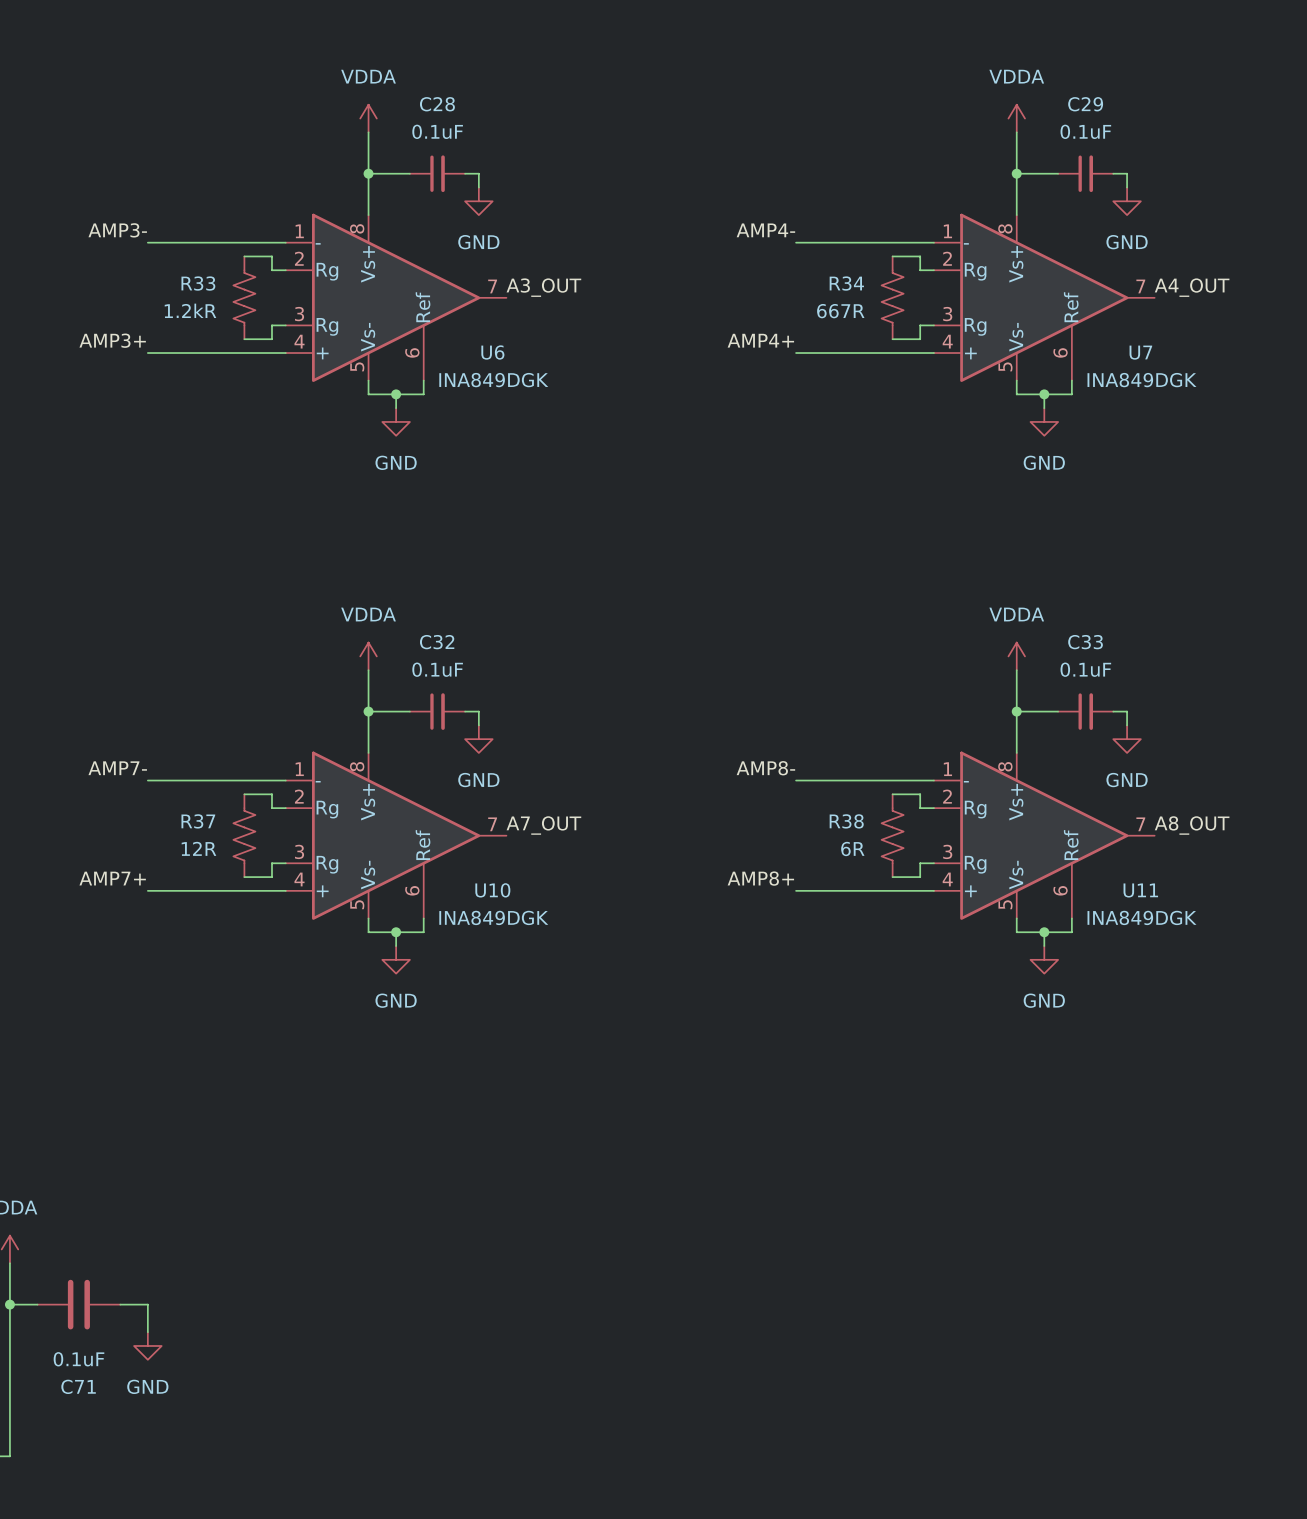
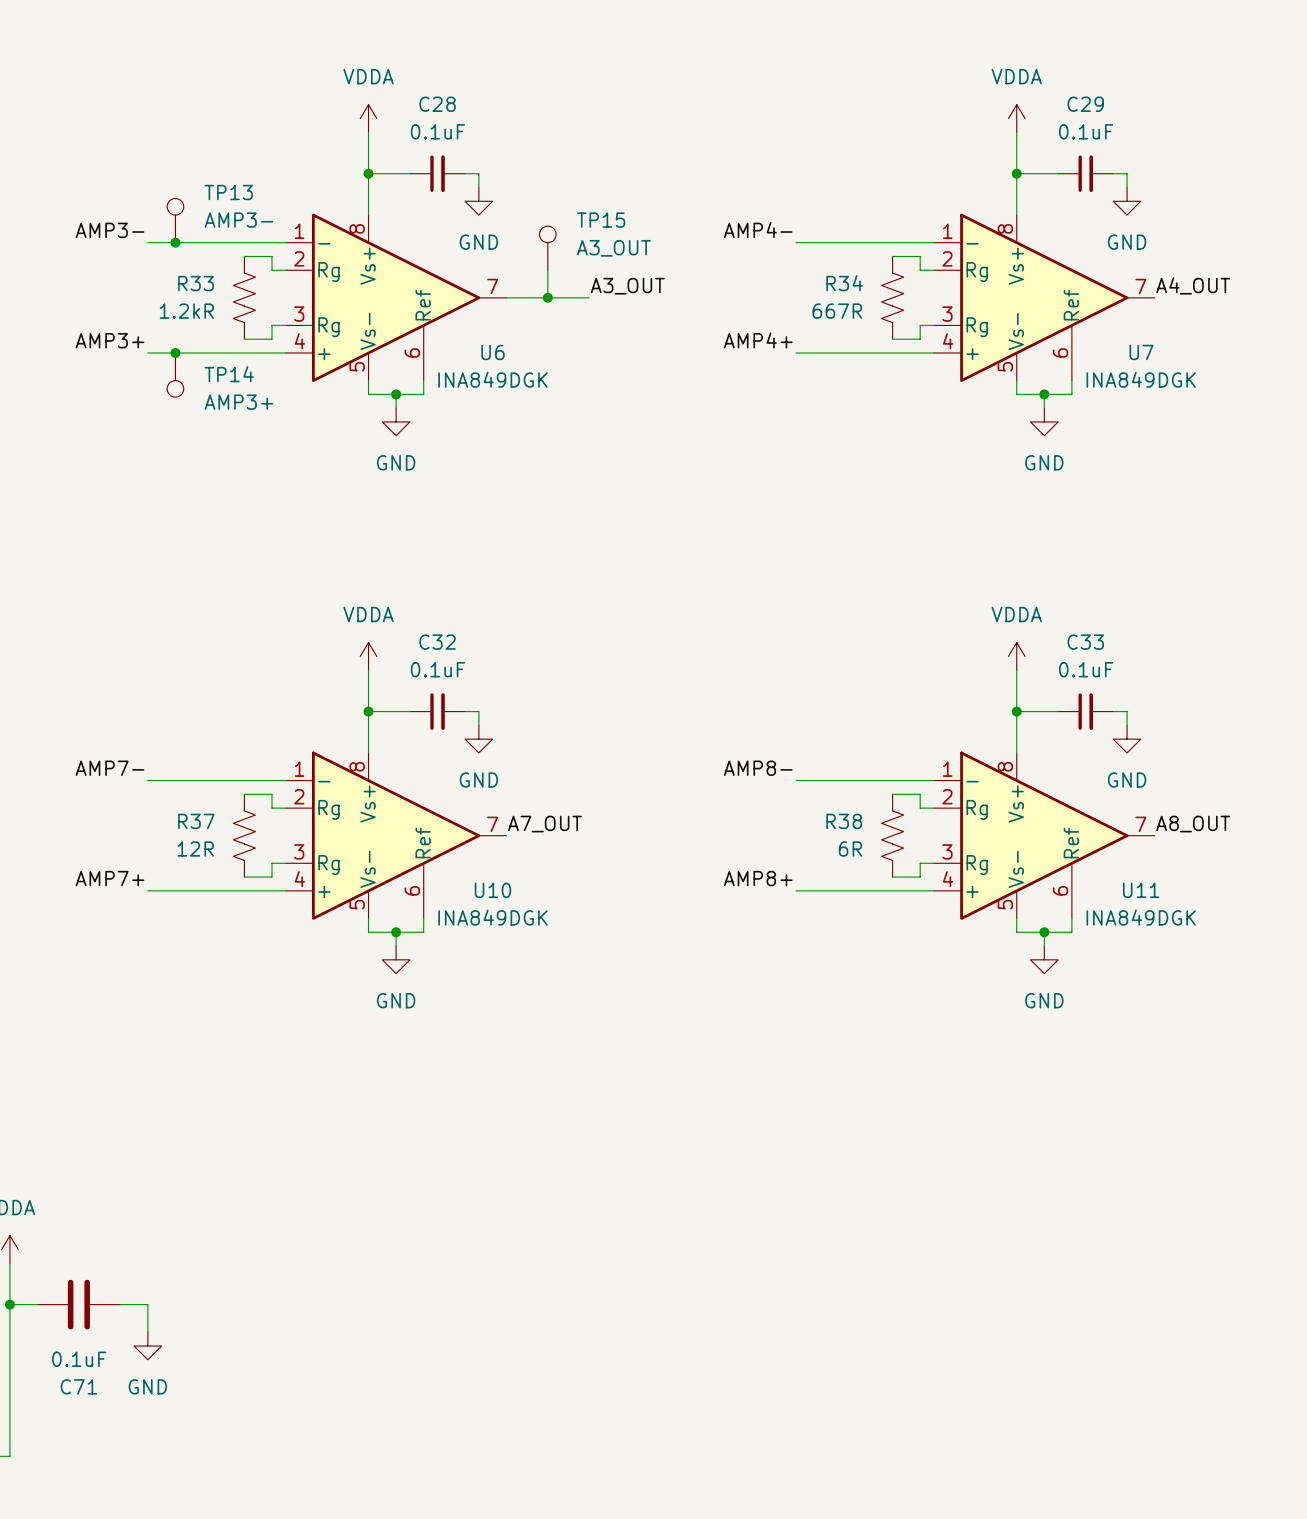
TP13: none -> AMP3- (175, 220)
junction: none -> (175, 242)
TP15: none -> A3_OUT (547, 248)
wire: none -> (547, 270) (547, 297)
label position: A3_OUT (543, 287) -> A3_OUT (627, 286)
wire: none -> (506, 297) (589, 297)
junction: none -> (547, 297)
junction: none -> (175, 353)
TP14: none -> AMP3+ (175, 375)

